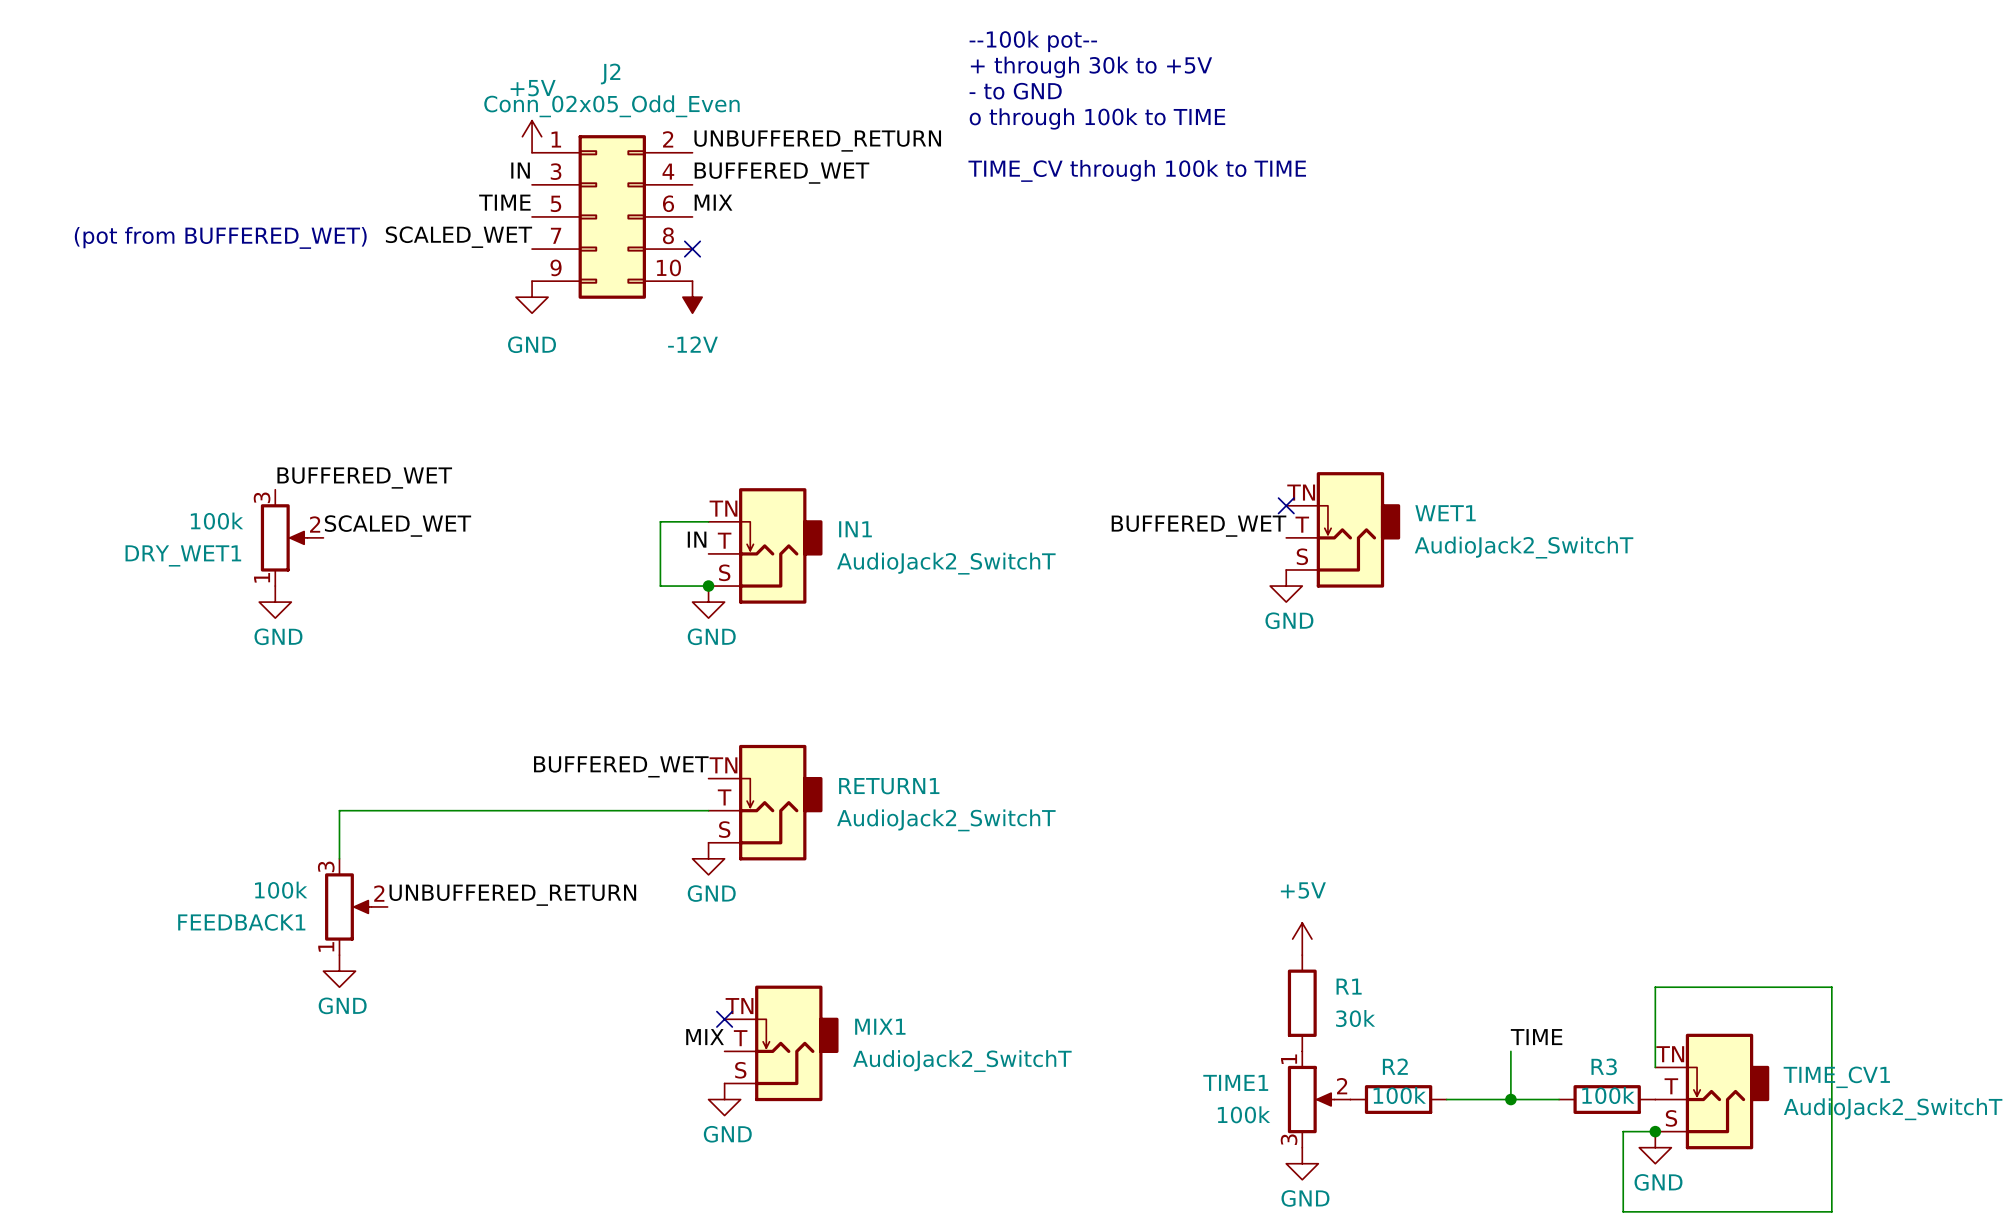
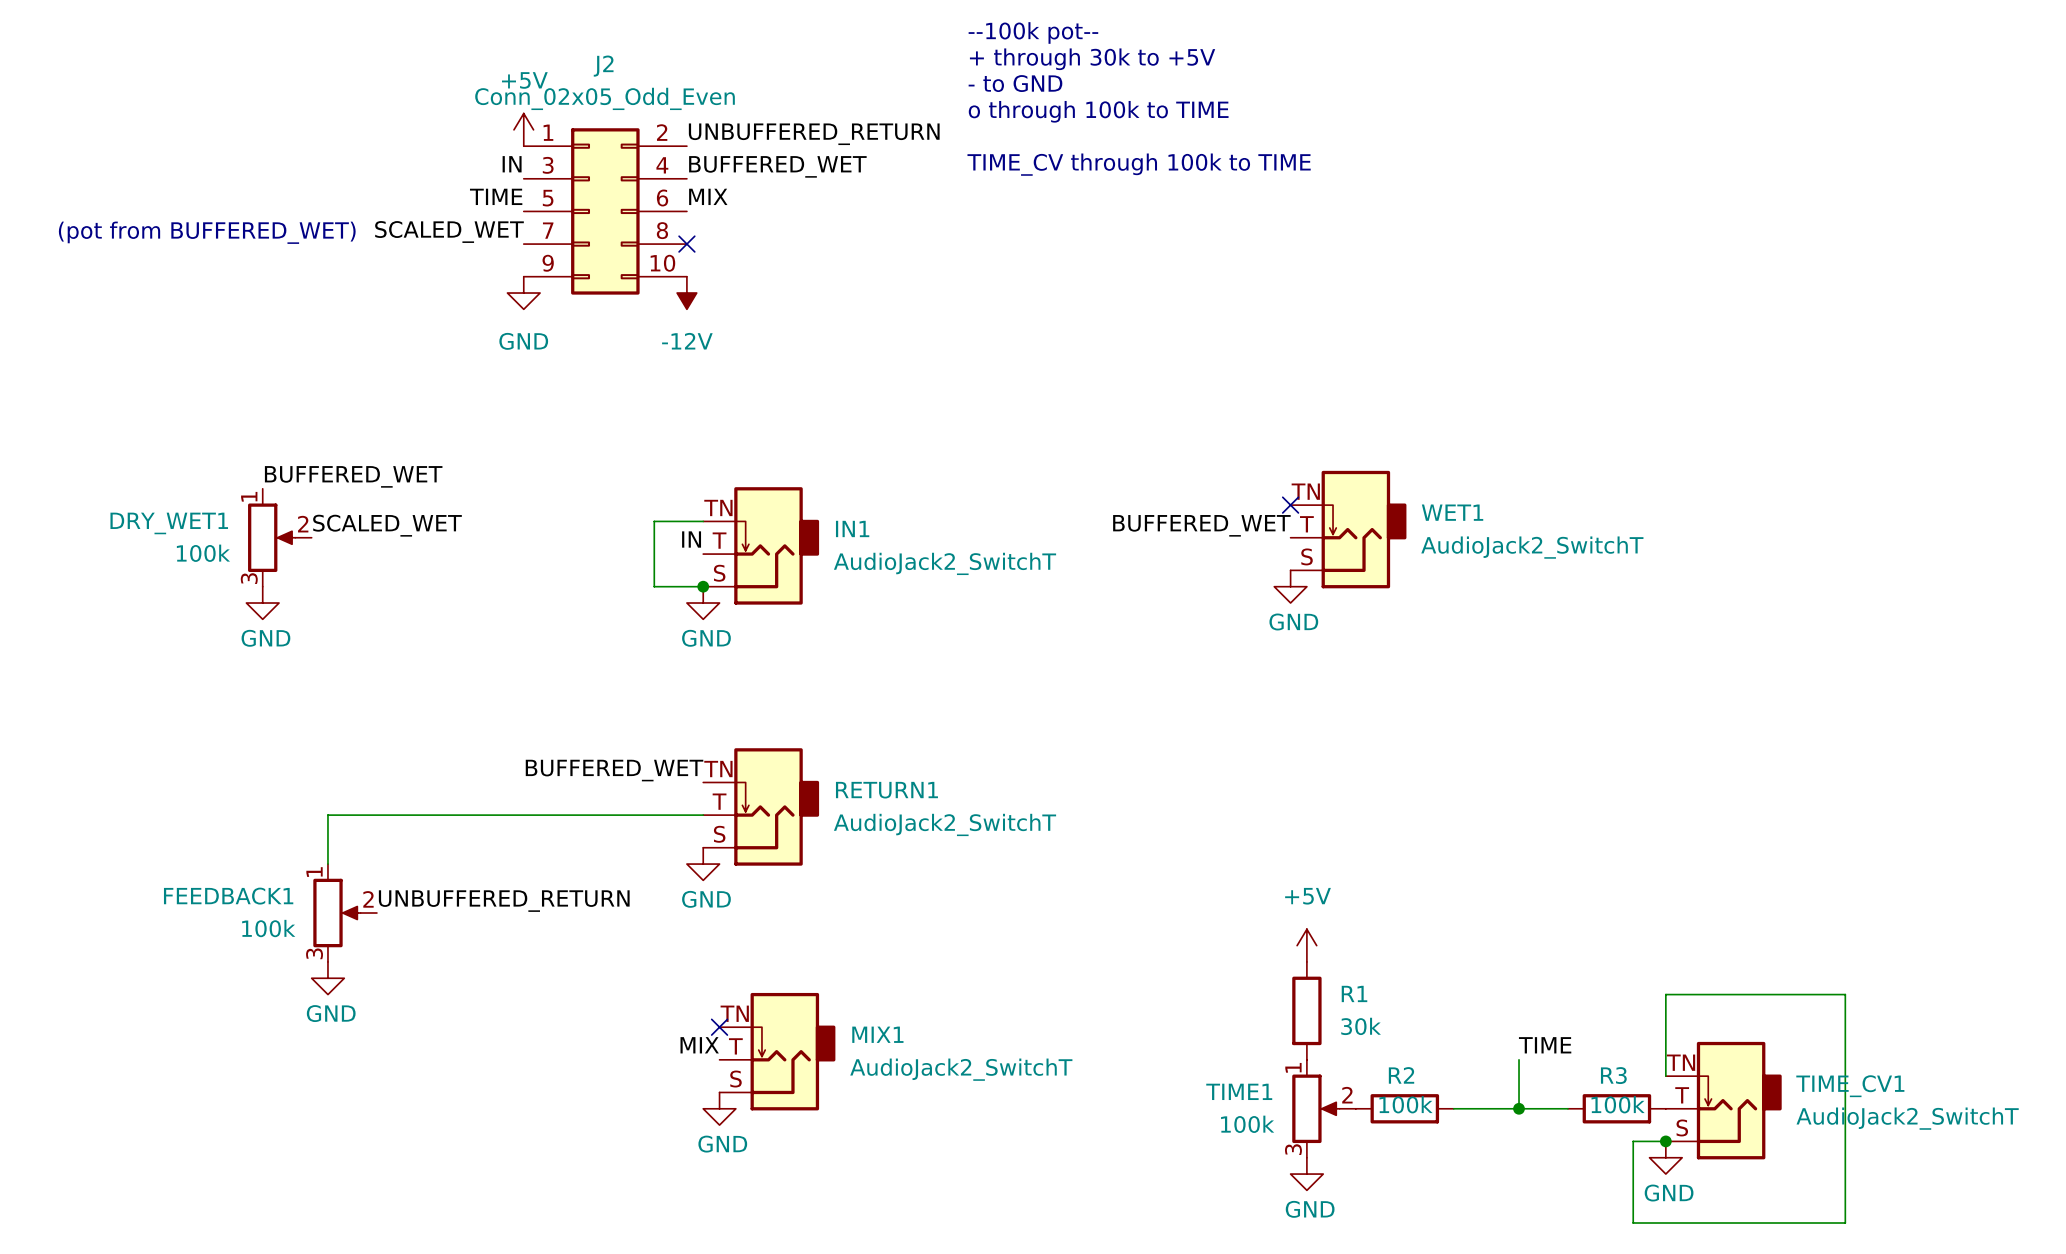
DRY_WET1 flip: as is (284, 537) -> up-down (271, 537)
FEEDBACK1 flip: as is (348, 906) -> up-down (336, 913)

